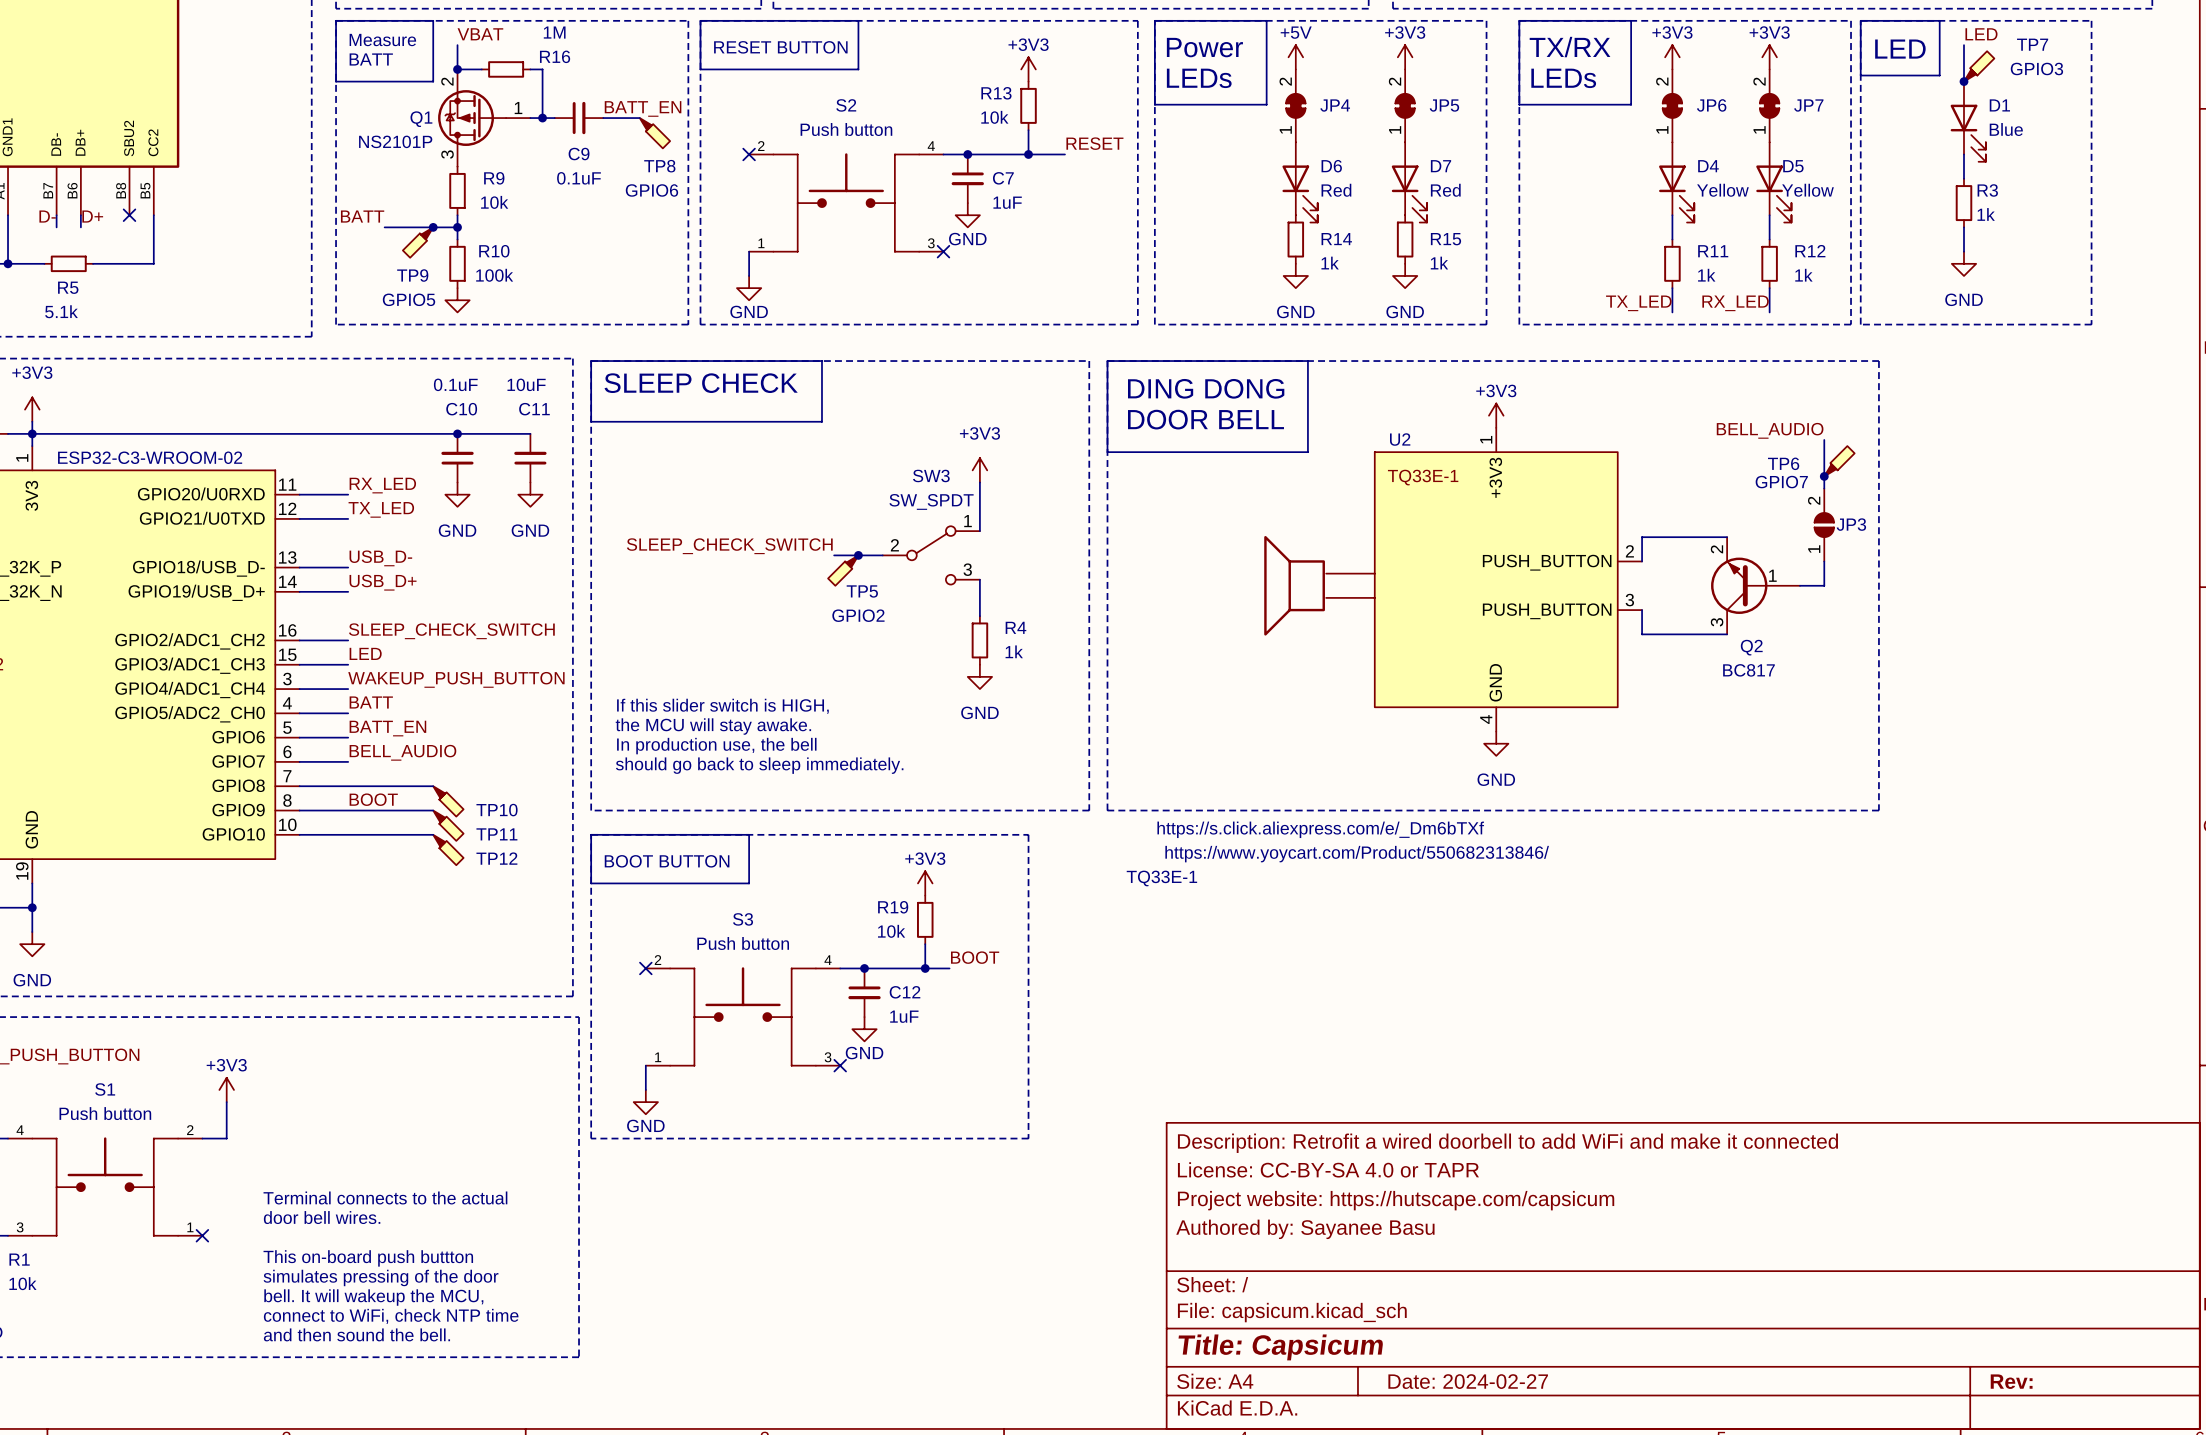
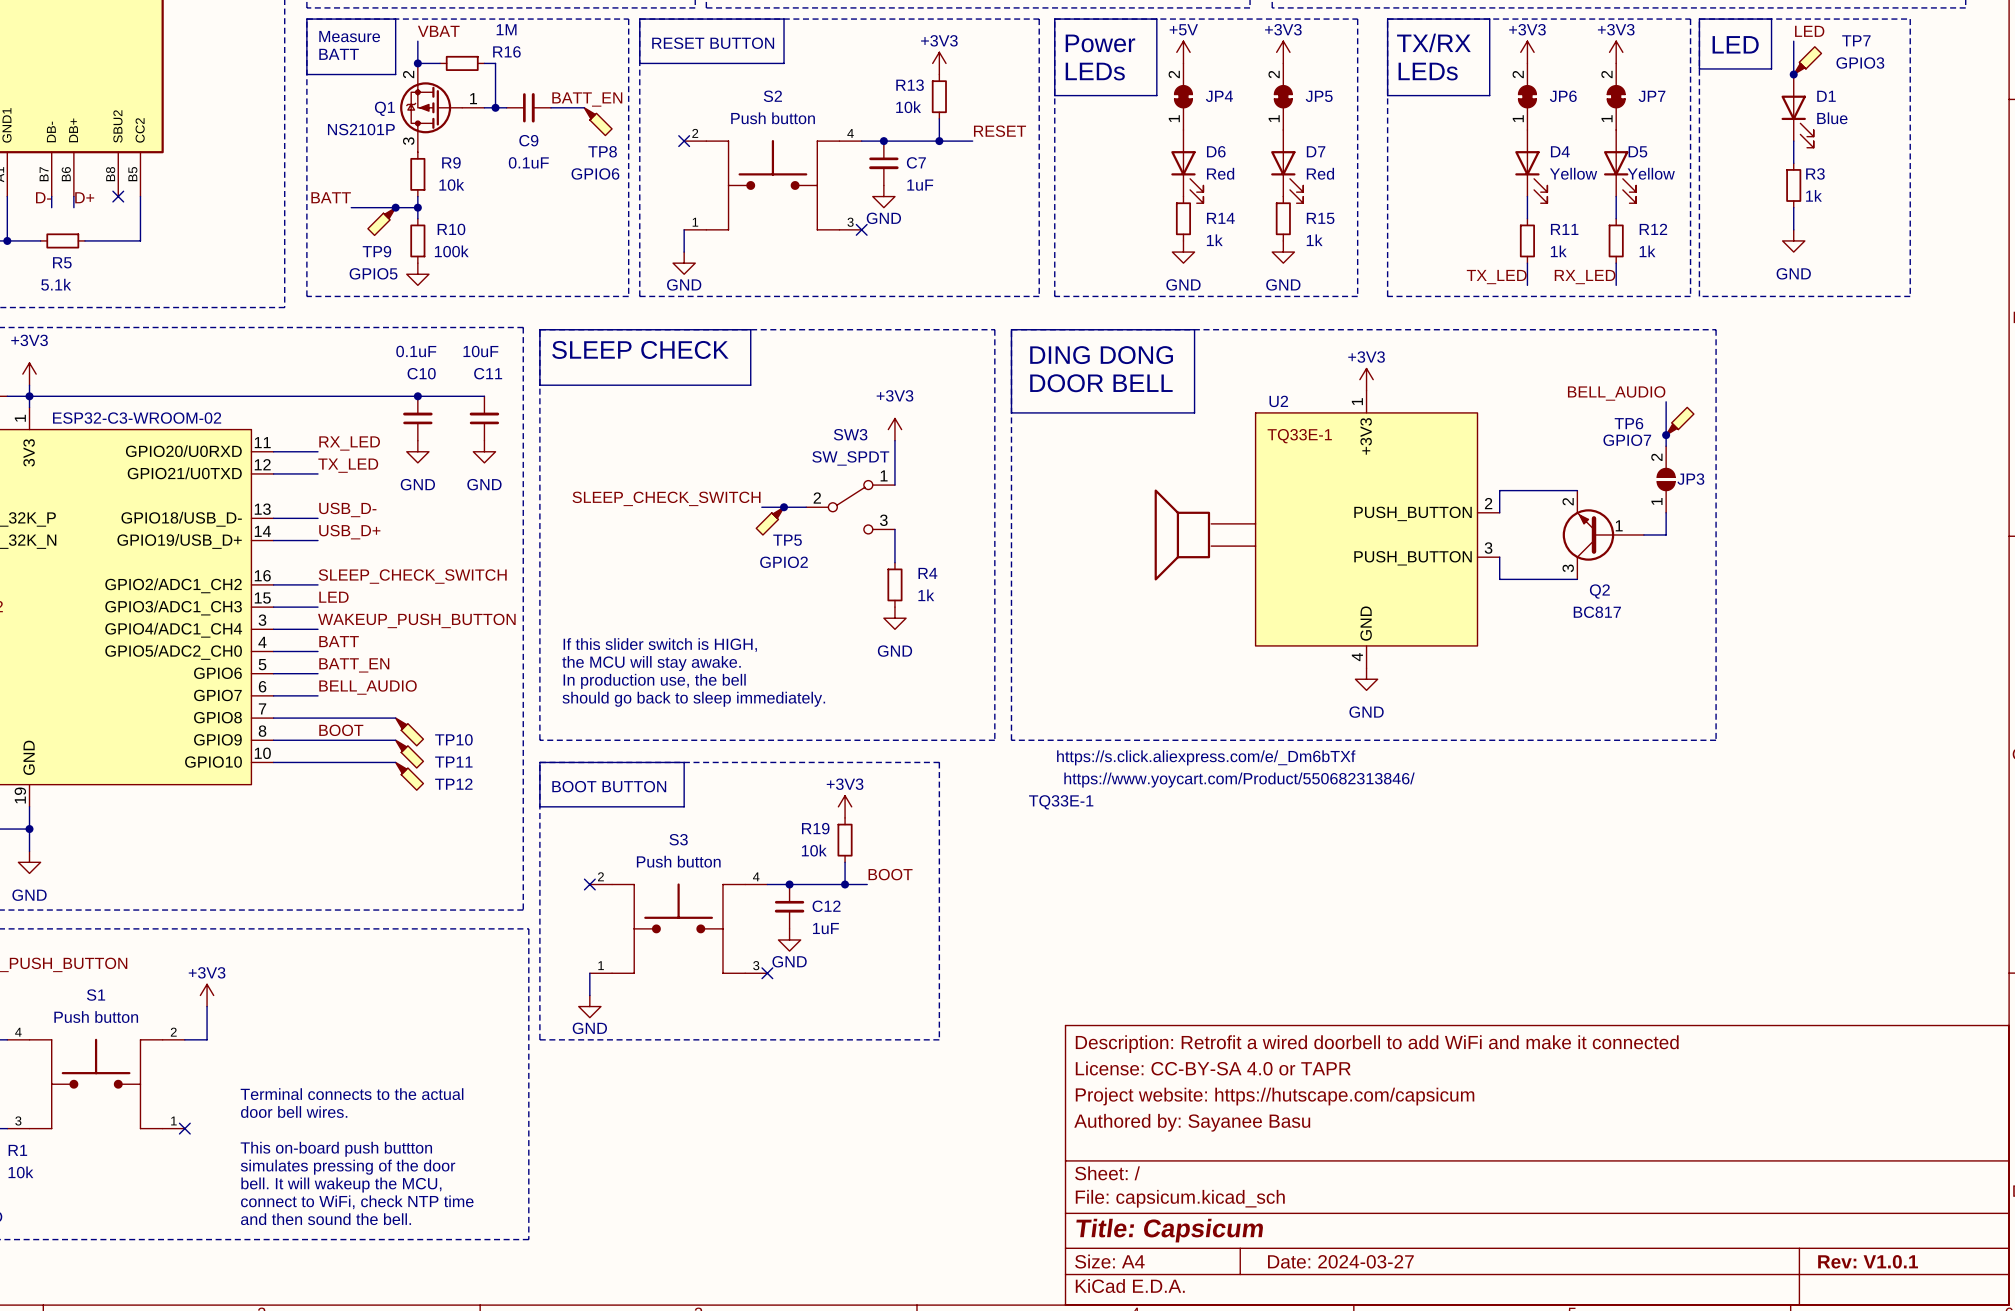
title block: Date: 2024-02-27 (1468, 1381) -> Date: 2024-03-27 (1340, 1261)
title block: Rev: (2011, 1381) -> Rev: V1.0.1 (1868, 1261)

